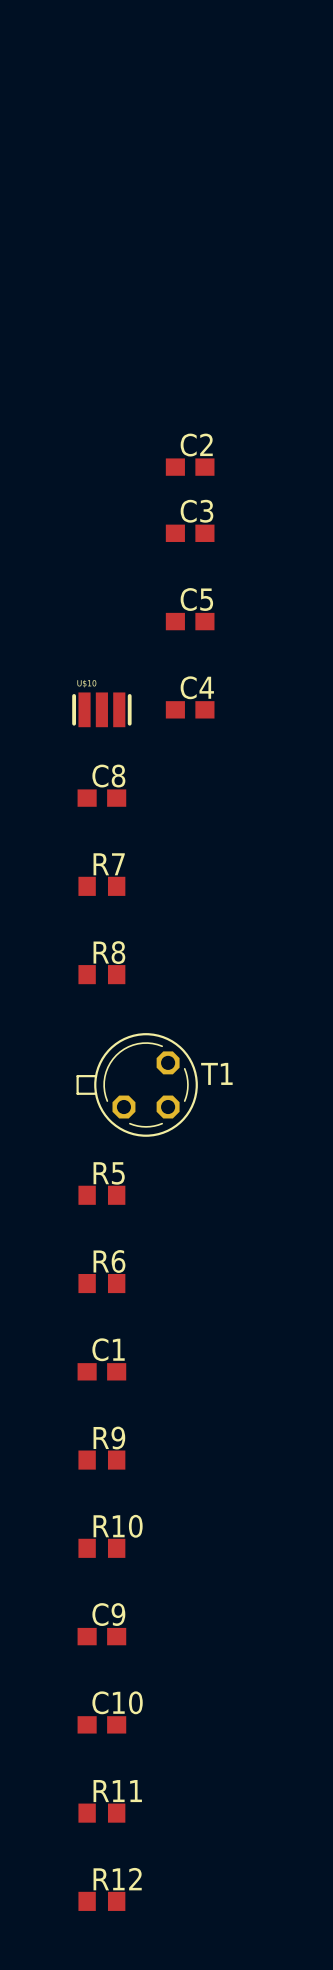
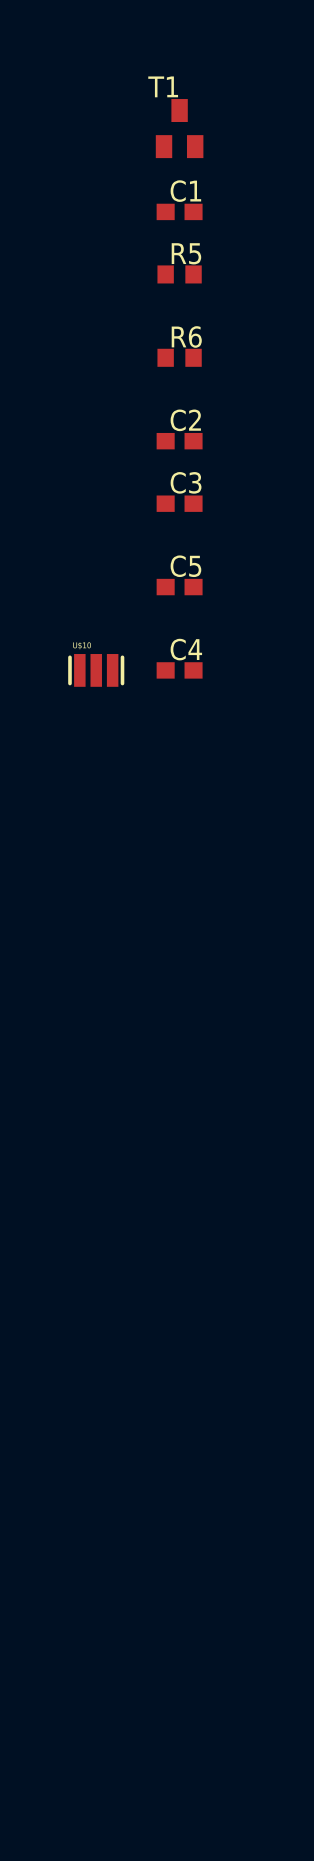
C8: (101, 798) -> none
R7: (101, 886) -> none
R8: (101, 974) -> none
T1 footprint: [76, 1033, 198, 1137] -> [155, 99, 204, 159]
T1 name position: T1 (216, 1073) -> T1 (163, 86)
R5 position: (101, 1195) -> (179, 274)
R6 position: (101, 1283) -> (179, 357)
C1 position: (101, 1371) -> (179, 211)
R9: (101, 1460) -> none
R10: (101, 1548) -> none
C9: (101, 1636) -> none
C10: (101, 1724) -> none
R11: (101, 1813) -> none
R12: (101, 1901) -> none

